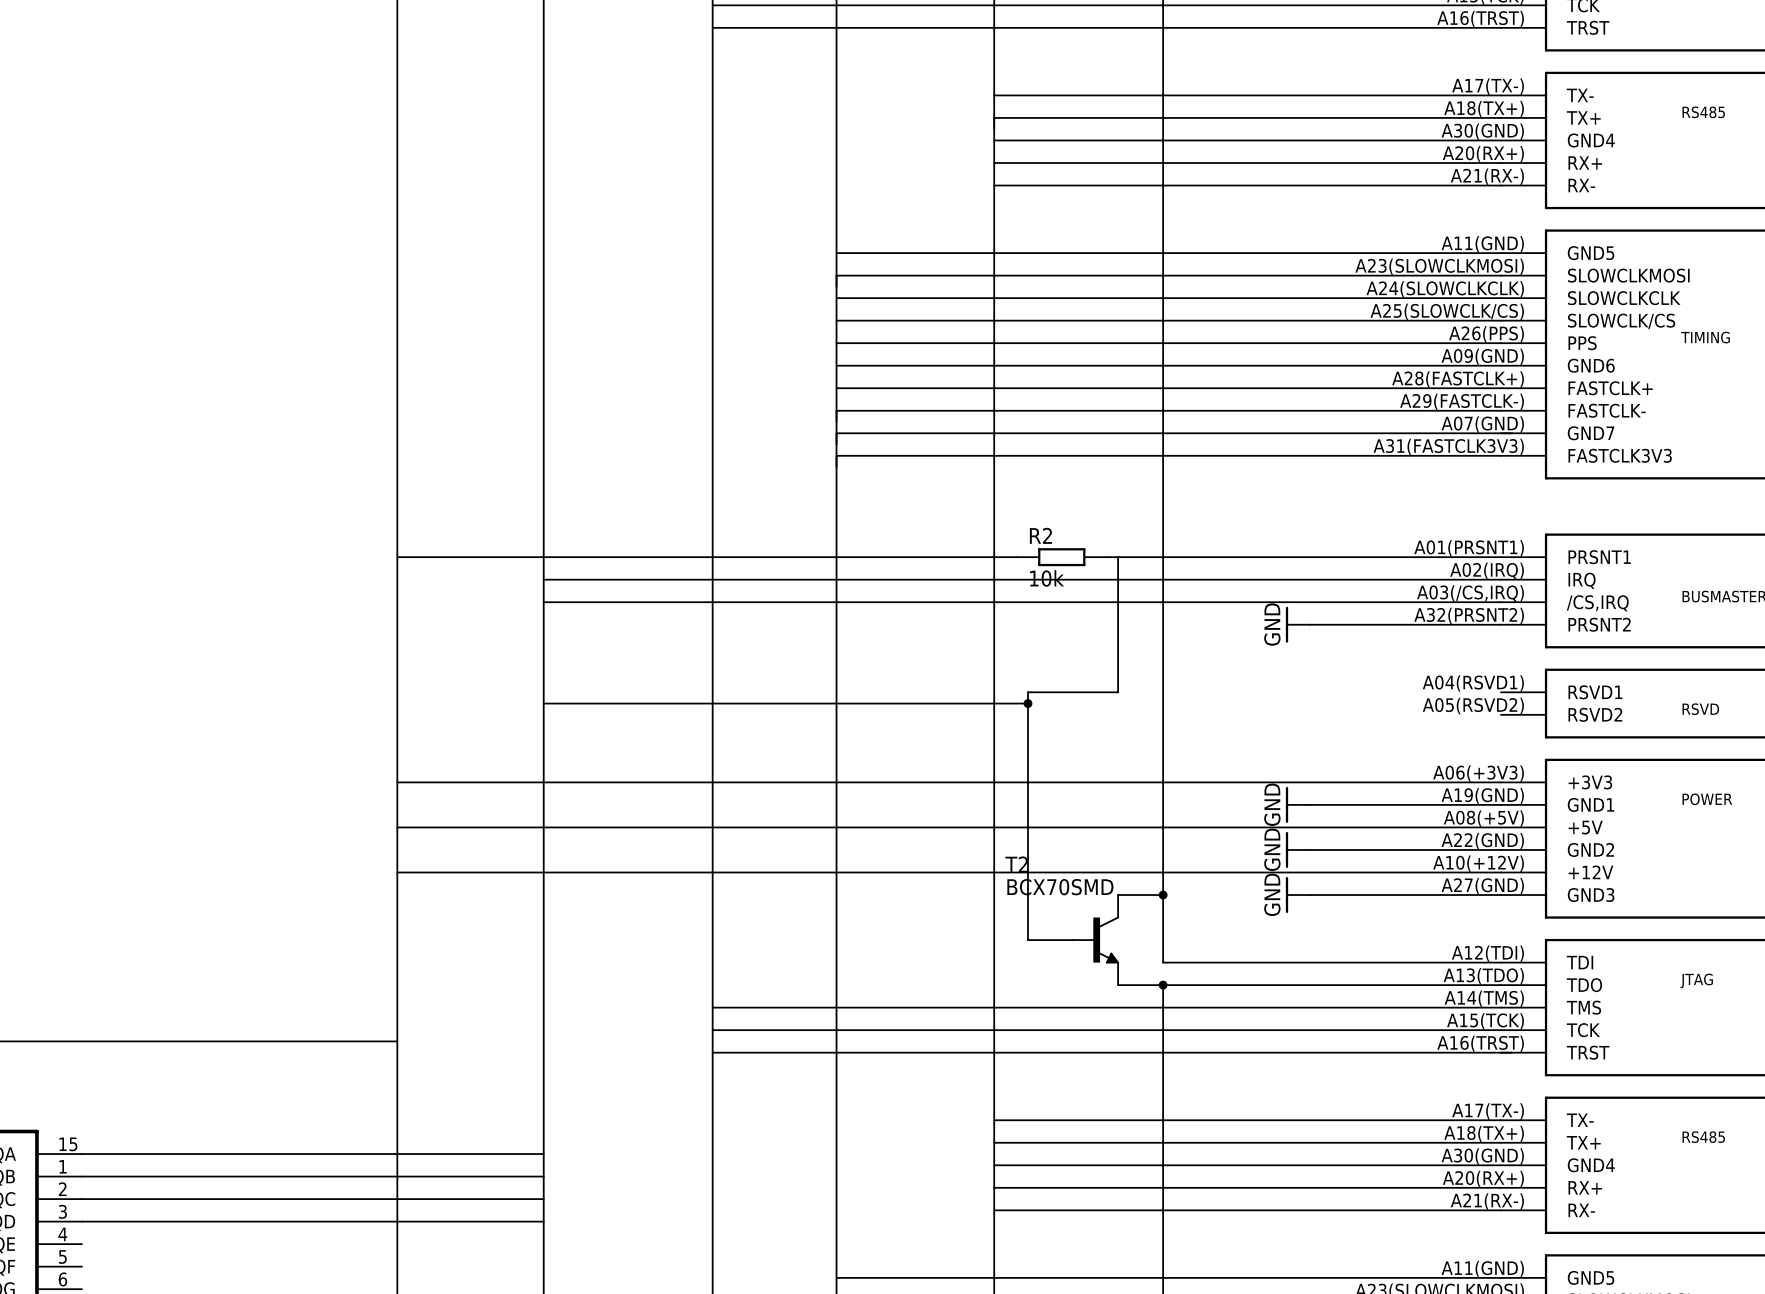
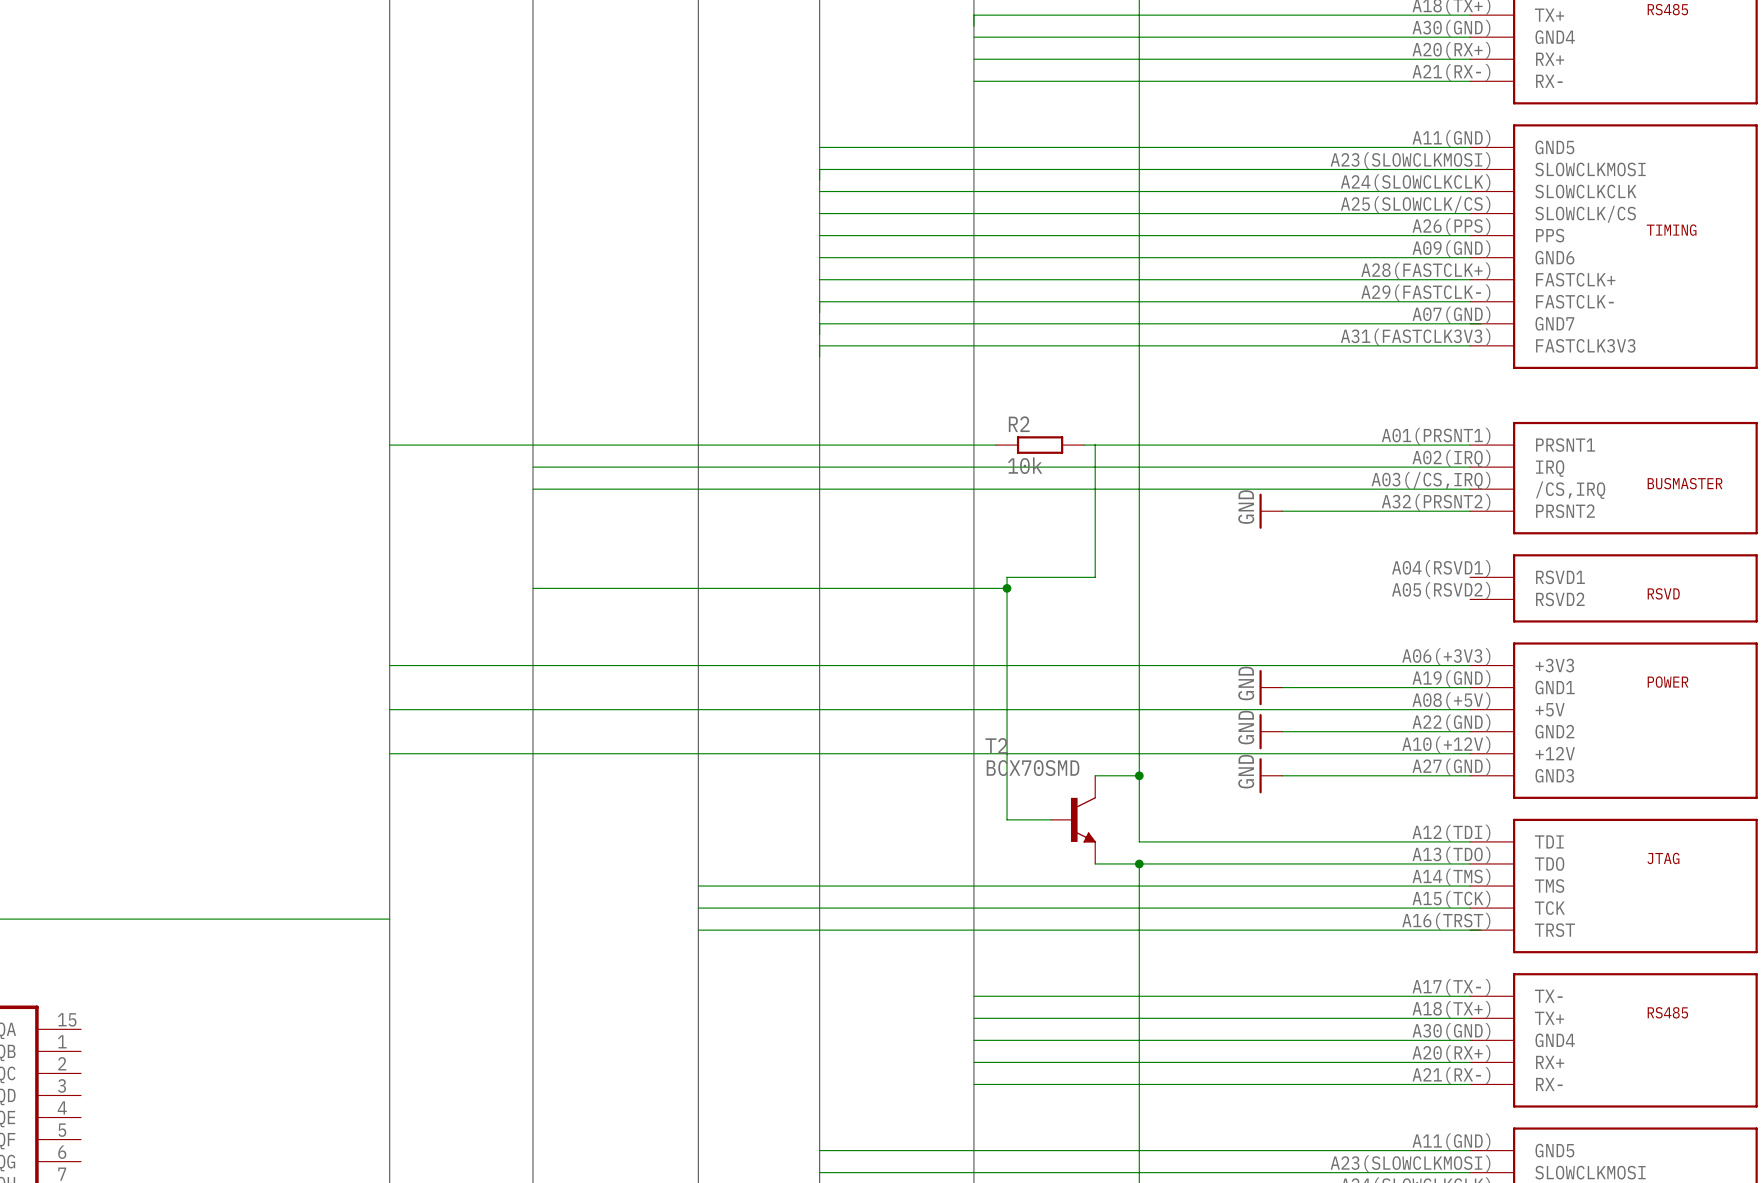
wire: (82, 1154) (543, 1154) -> none
wire: (82, 1176) (543, 1176) -> none
wire: (82, 1199) (543, 1199) -> none
wire: (82, 1221) (543, 1221) -> none

